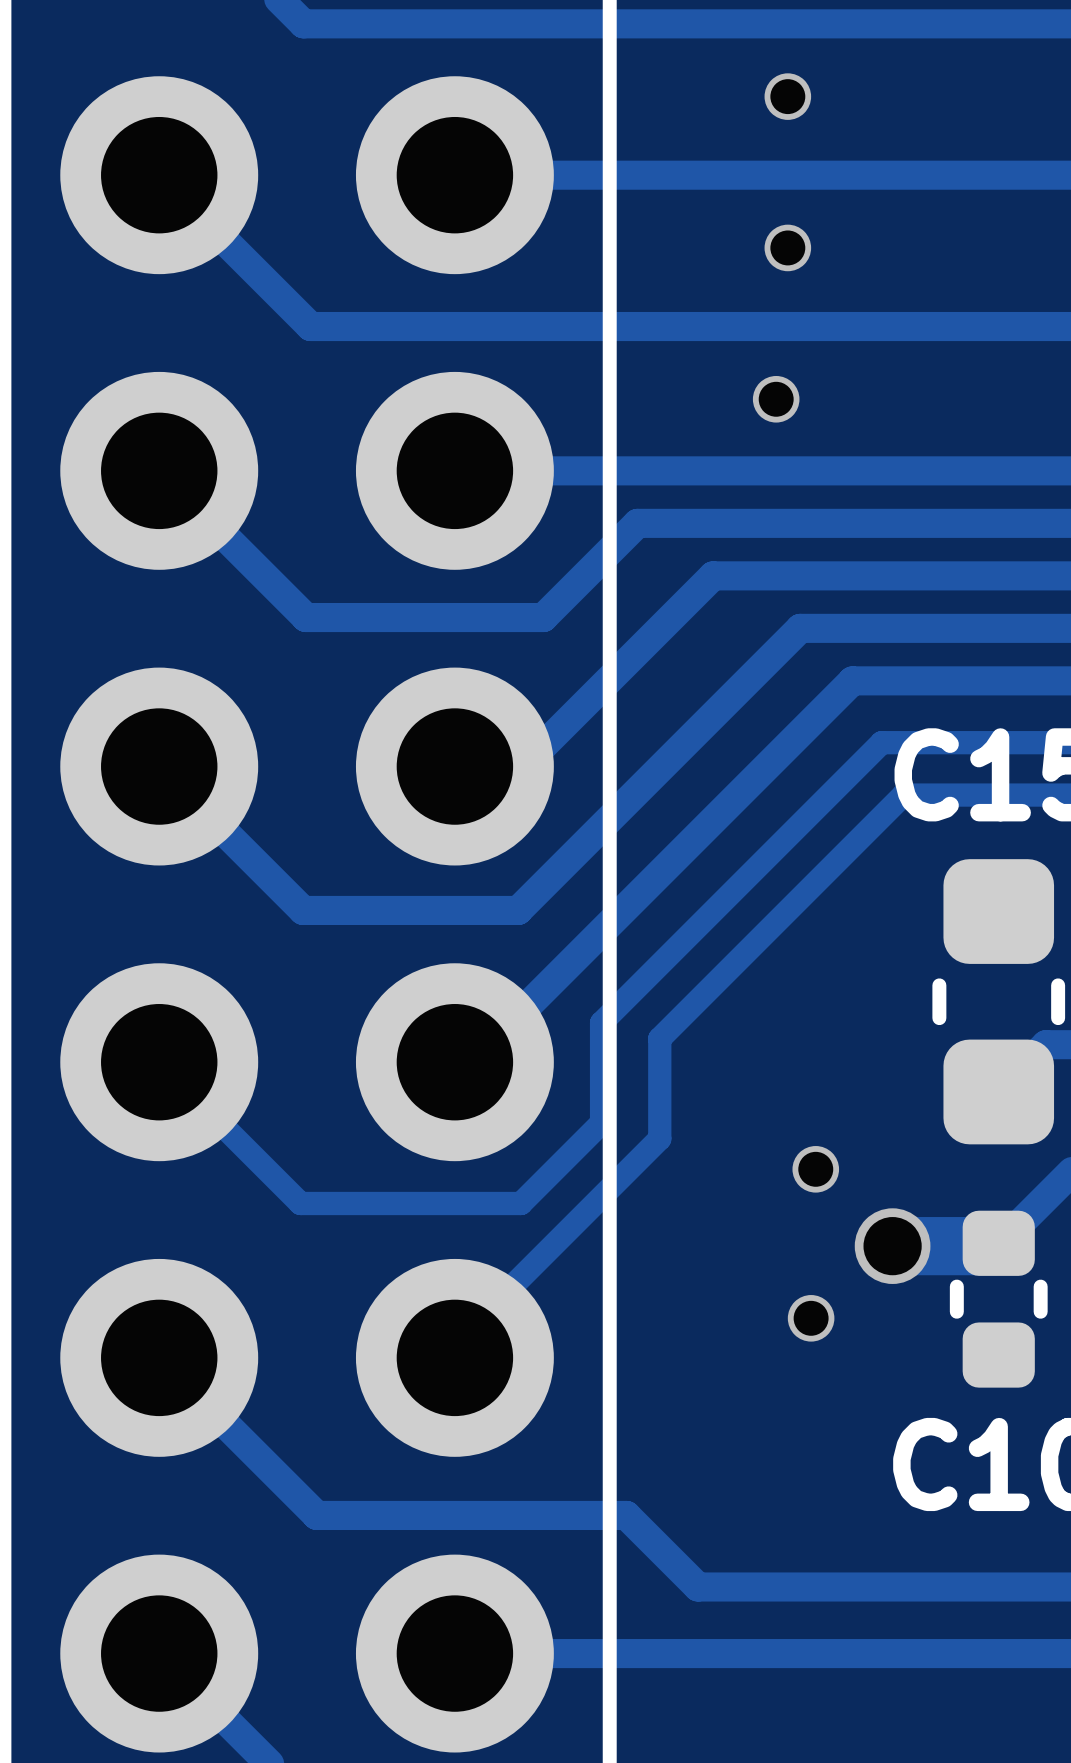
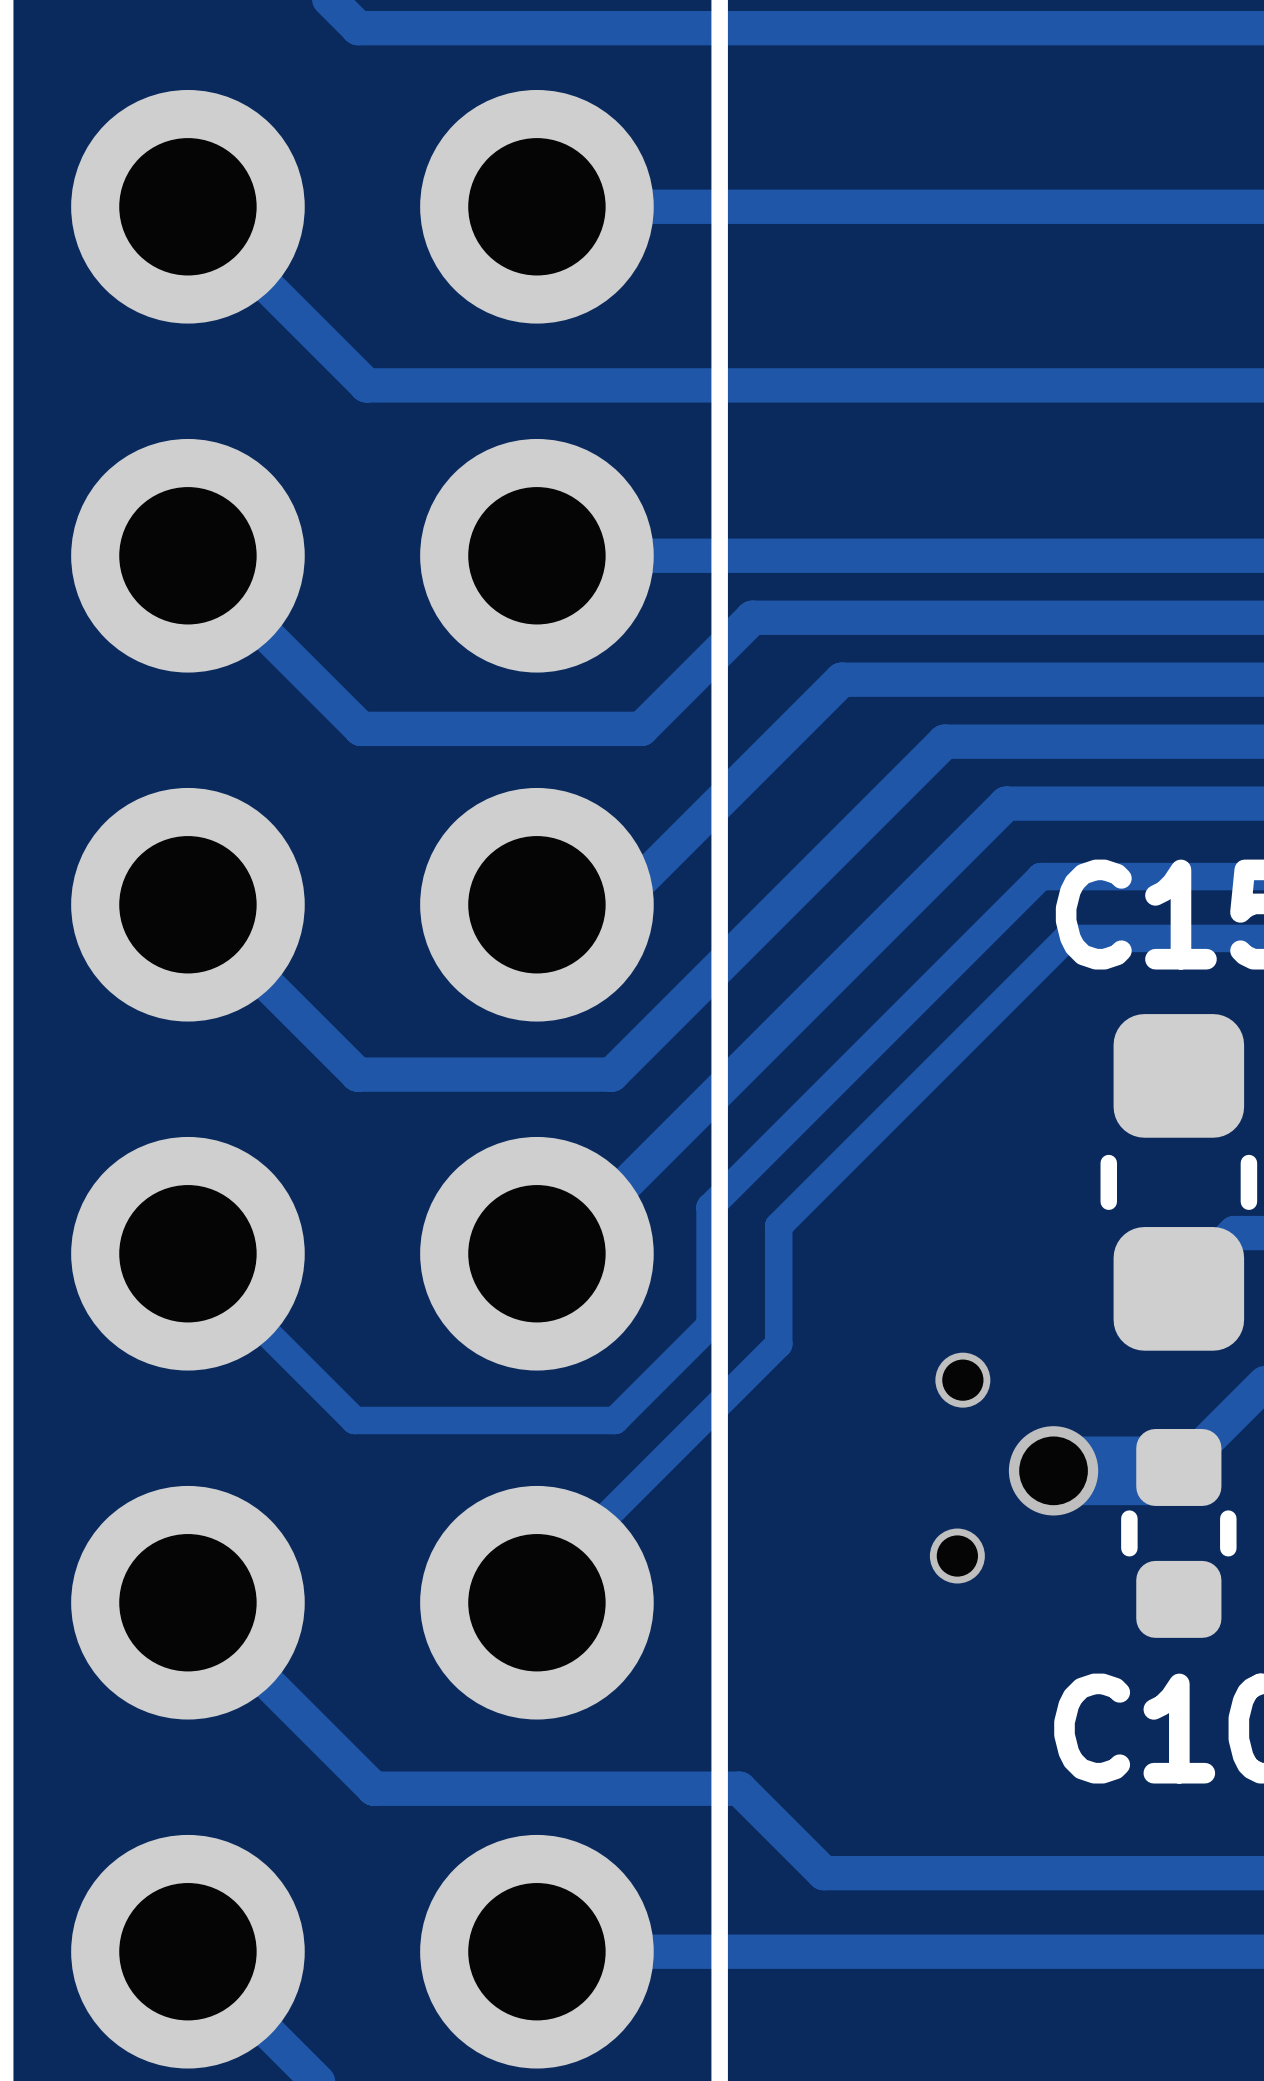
via: (787, 96) -> none
via: (787, 247) -> none
via: (776, 399) -> none

